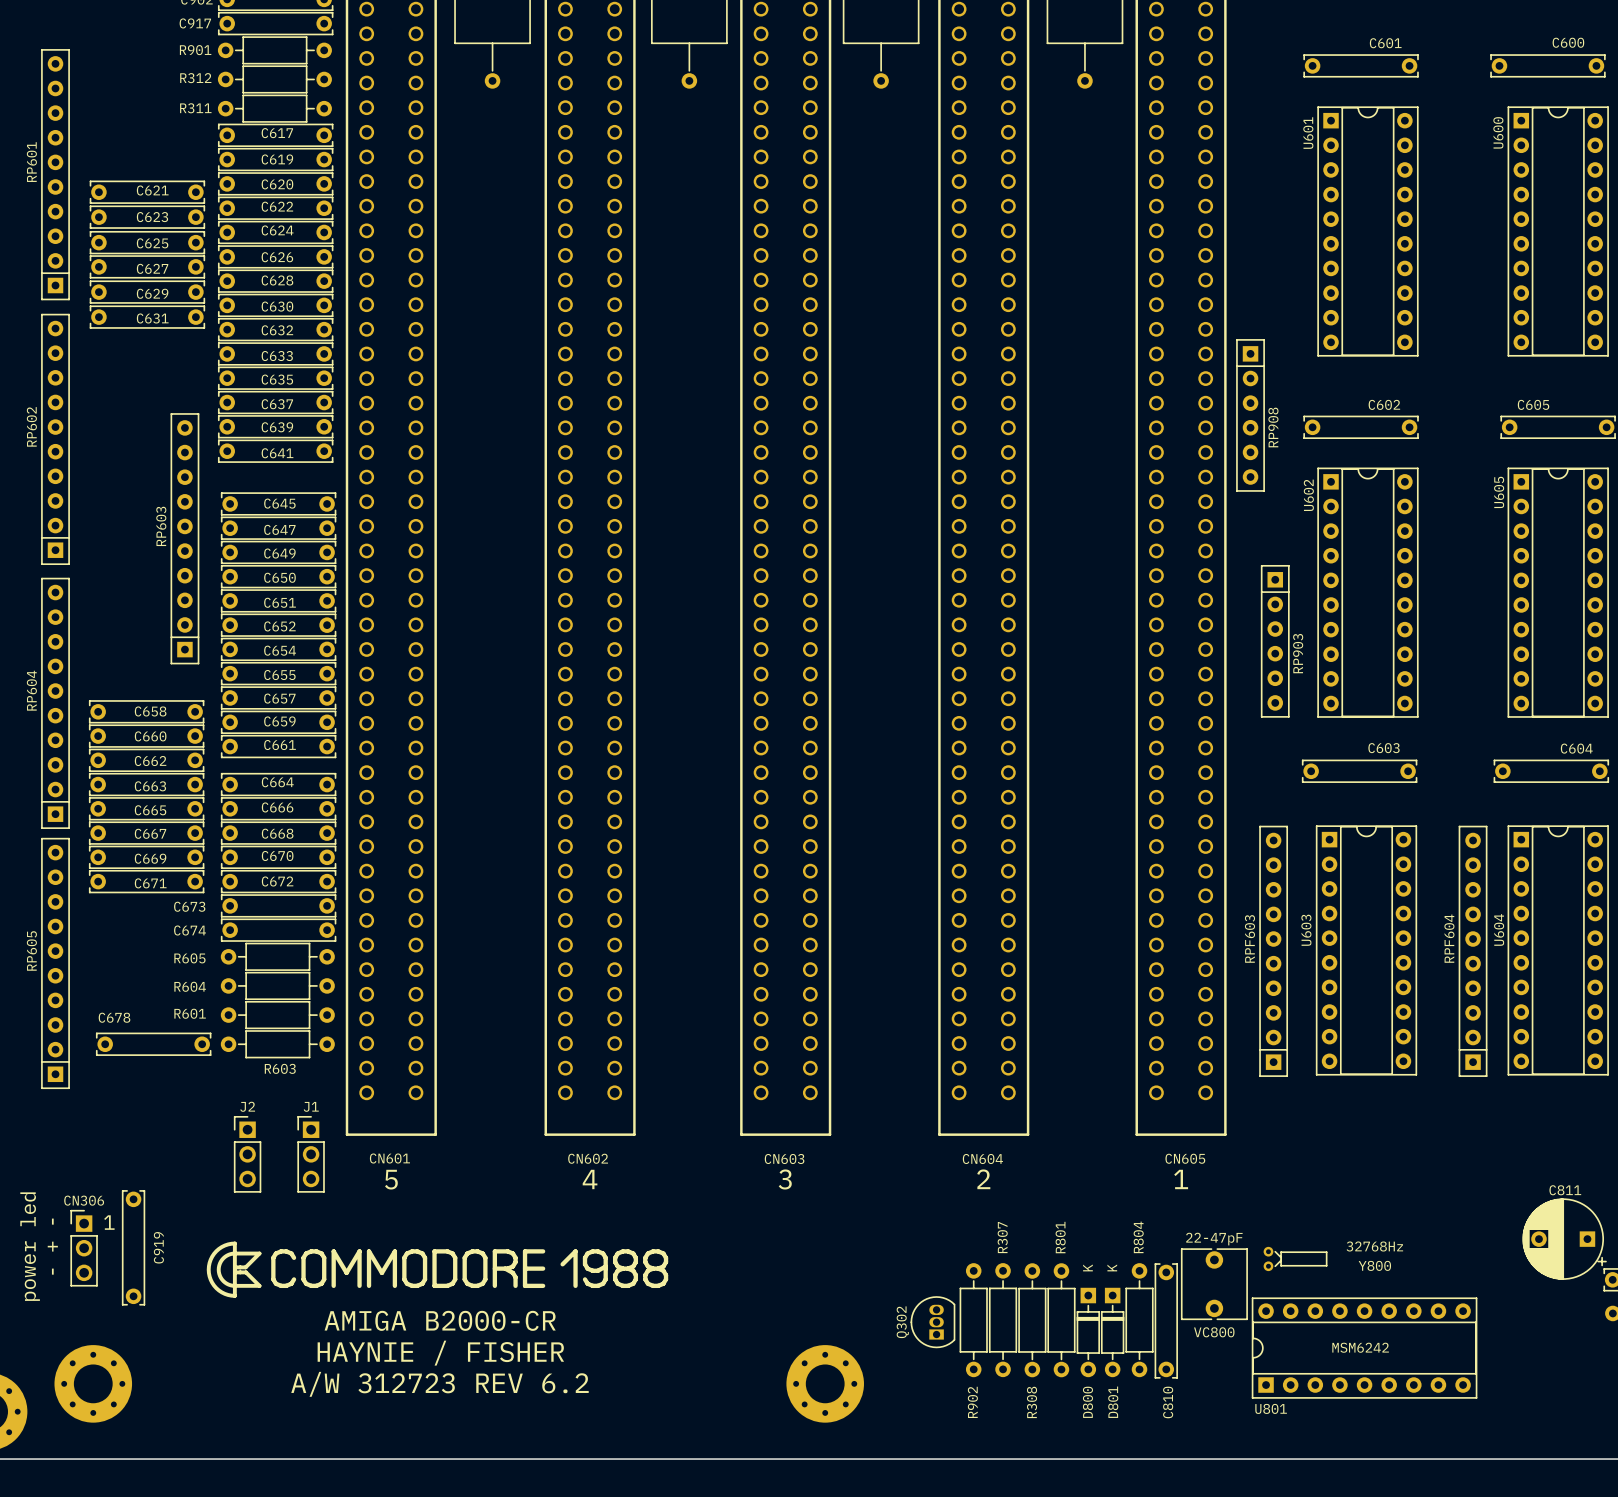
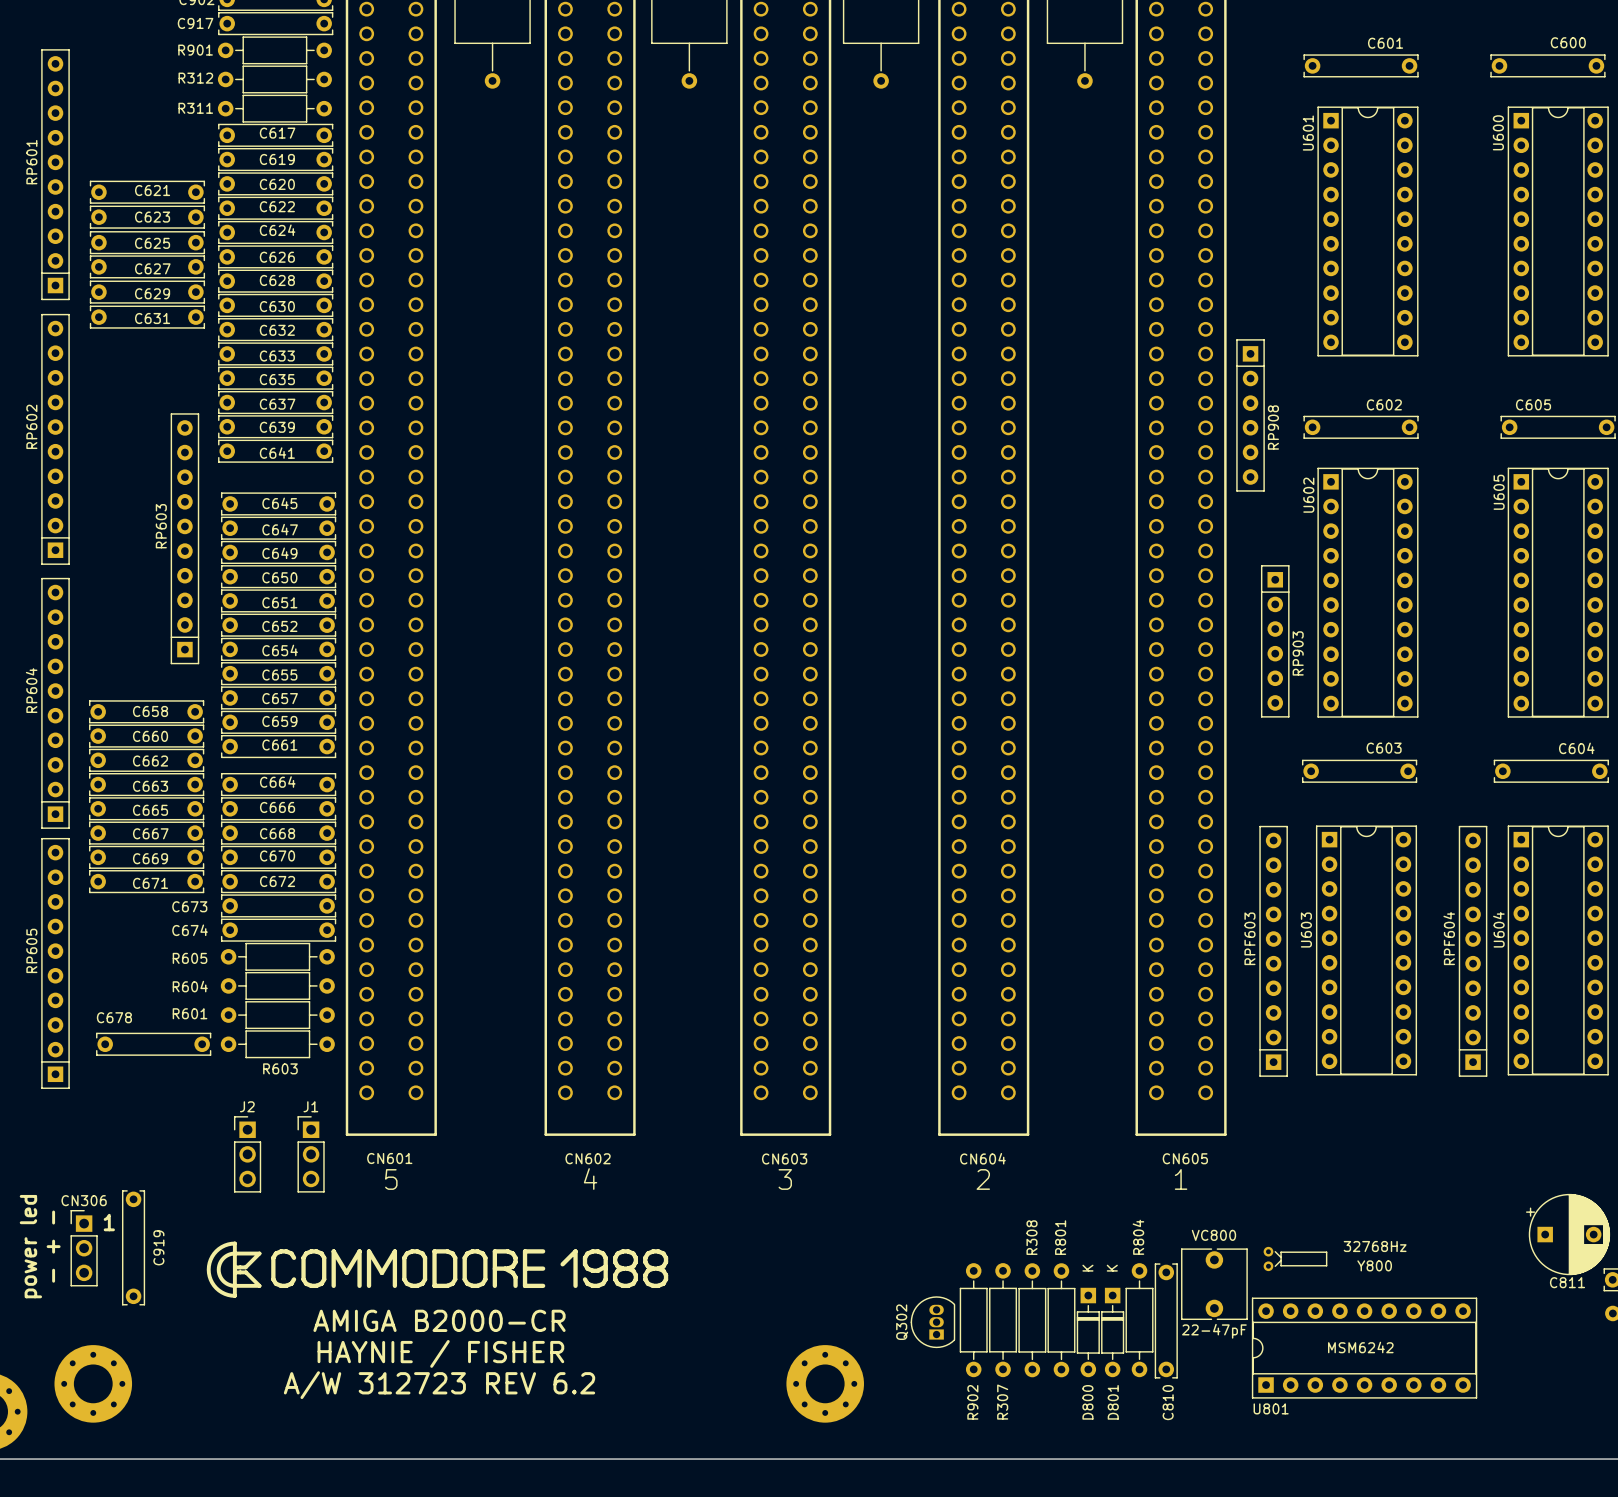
R307 name position: R307 (1002, 1237) -> R307 (1002, 1402)
VC800 value position: 22-47pF (1214, 1239) -> 22-47pF (1214, 1331)
C811 rotation: 0° (1564, 1239) -> 180° (1568, 1234)
VC800 name position: VC800 (1214, 1332) -> VC800 (1213, 1235)
R308 name position: R308 (1032, 1402) -> R308 (1032, 1237)

